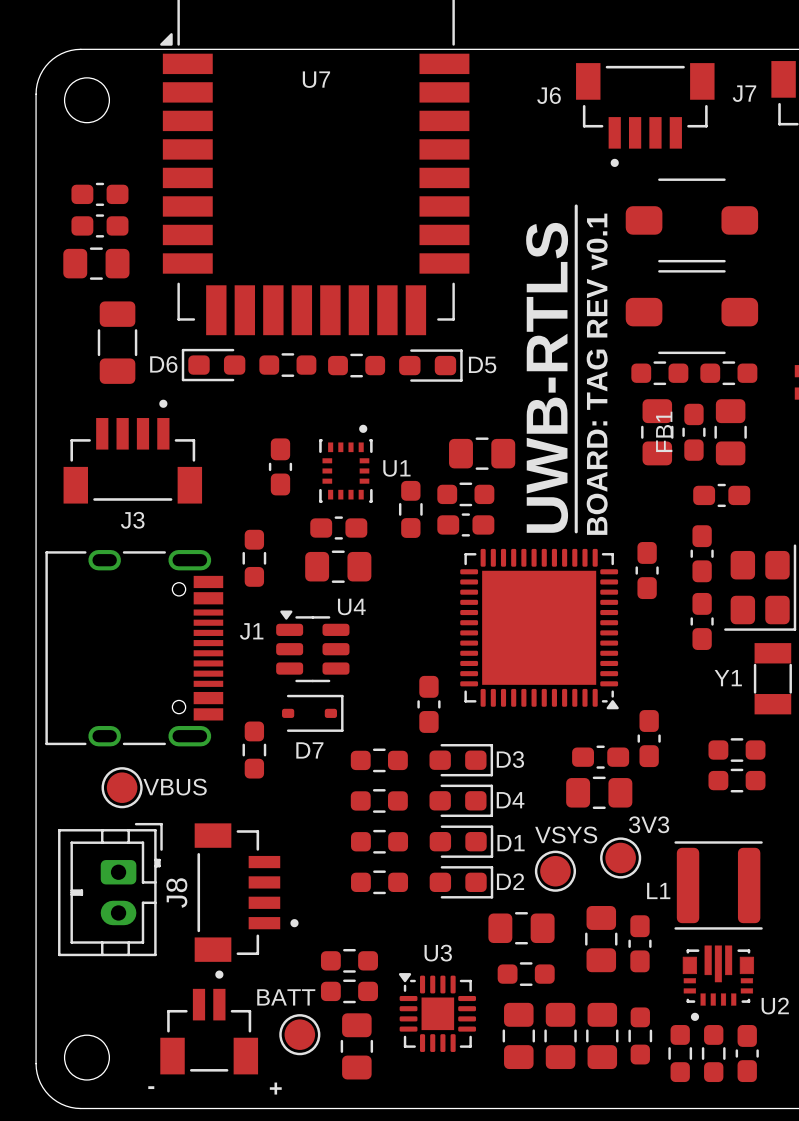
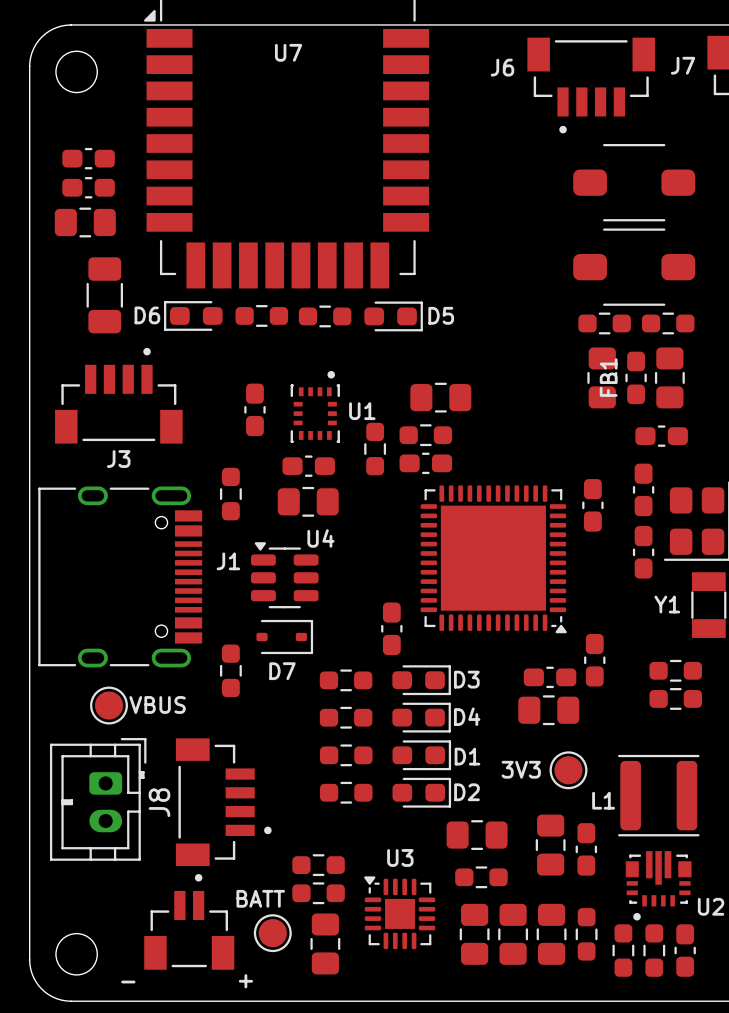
line: (576, 205) (576, 531) -> none
text: BOARD: TAG REV v0.1 (597, 374) -> none
text: UWB-RTLS (547, 377) -> none
part value position: 3V3 (649, 824) -> 3V3 (521, 769)
part: VSYS (555, 871) -> none

